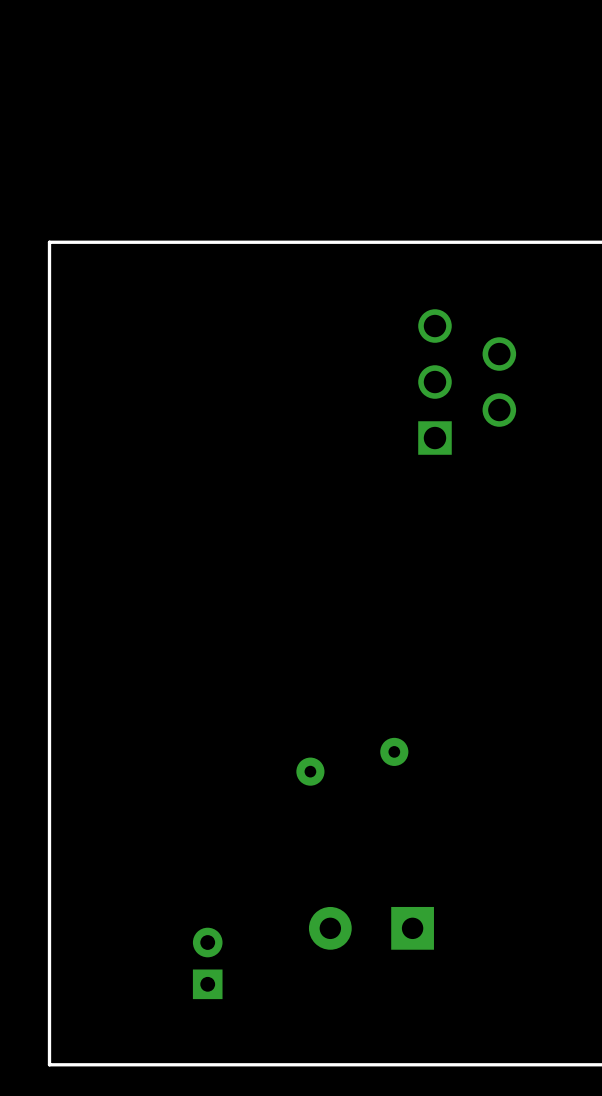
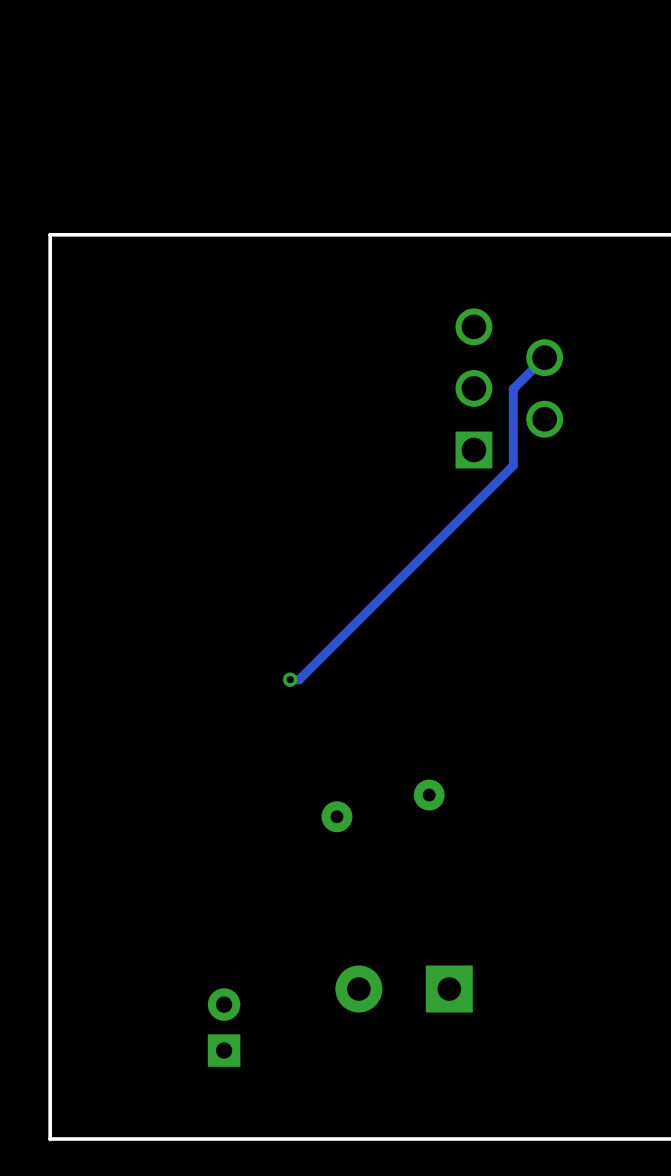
track: none -> (544, 357) (513, 389) (513, 465) (299, 679) (290, 679)
via: none -> (290, 679)

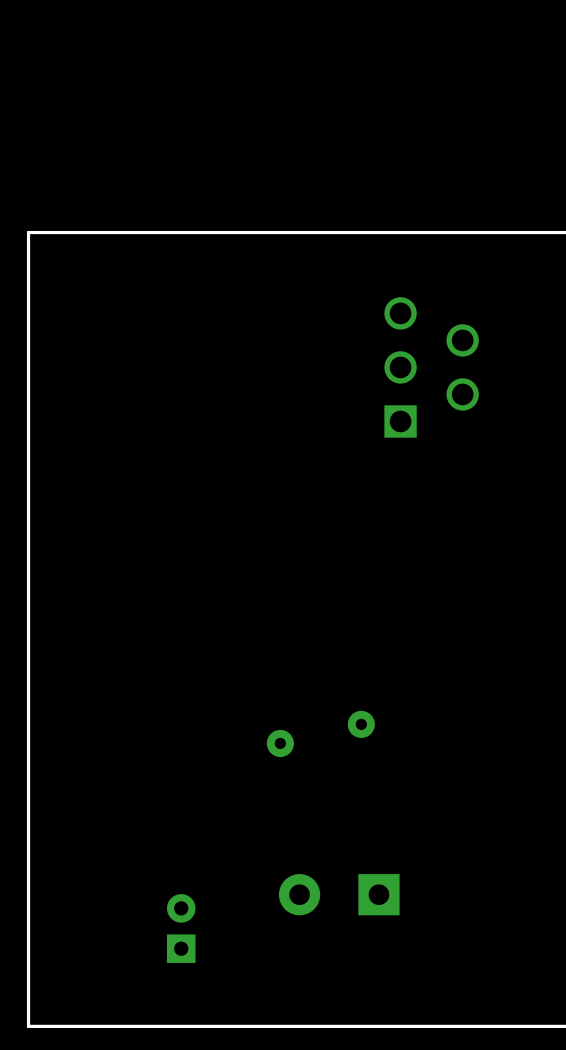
track: (544, 357) (513, 389) (513, 465) (299, 679) (290, 679) -> none
via: (290, 679) -> none

